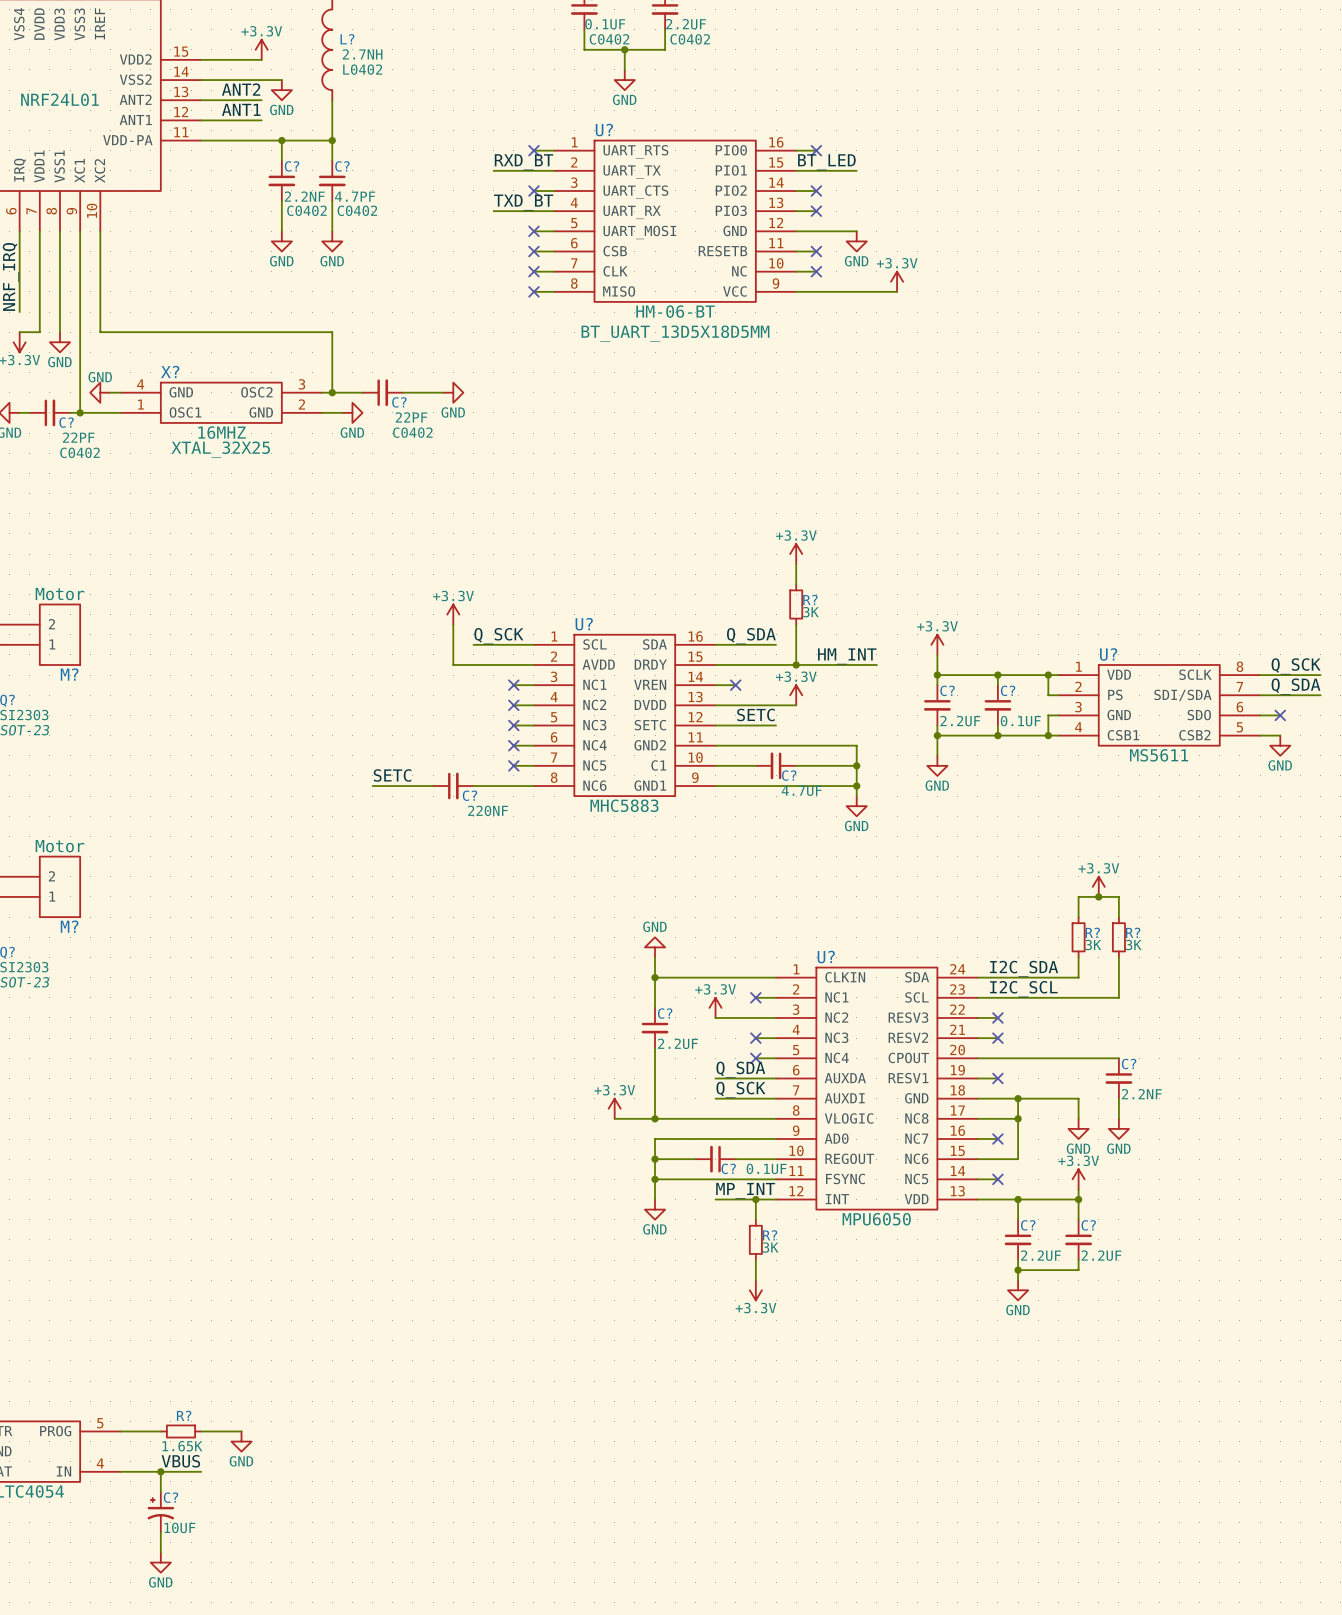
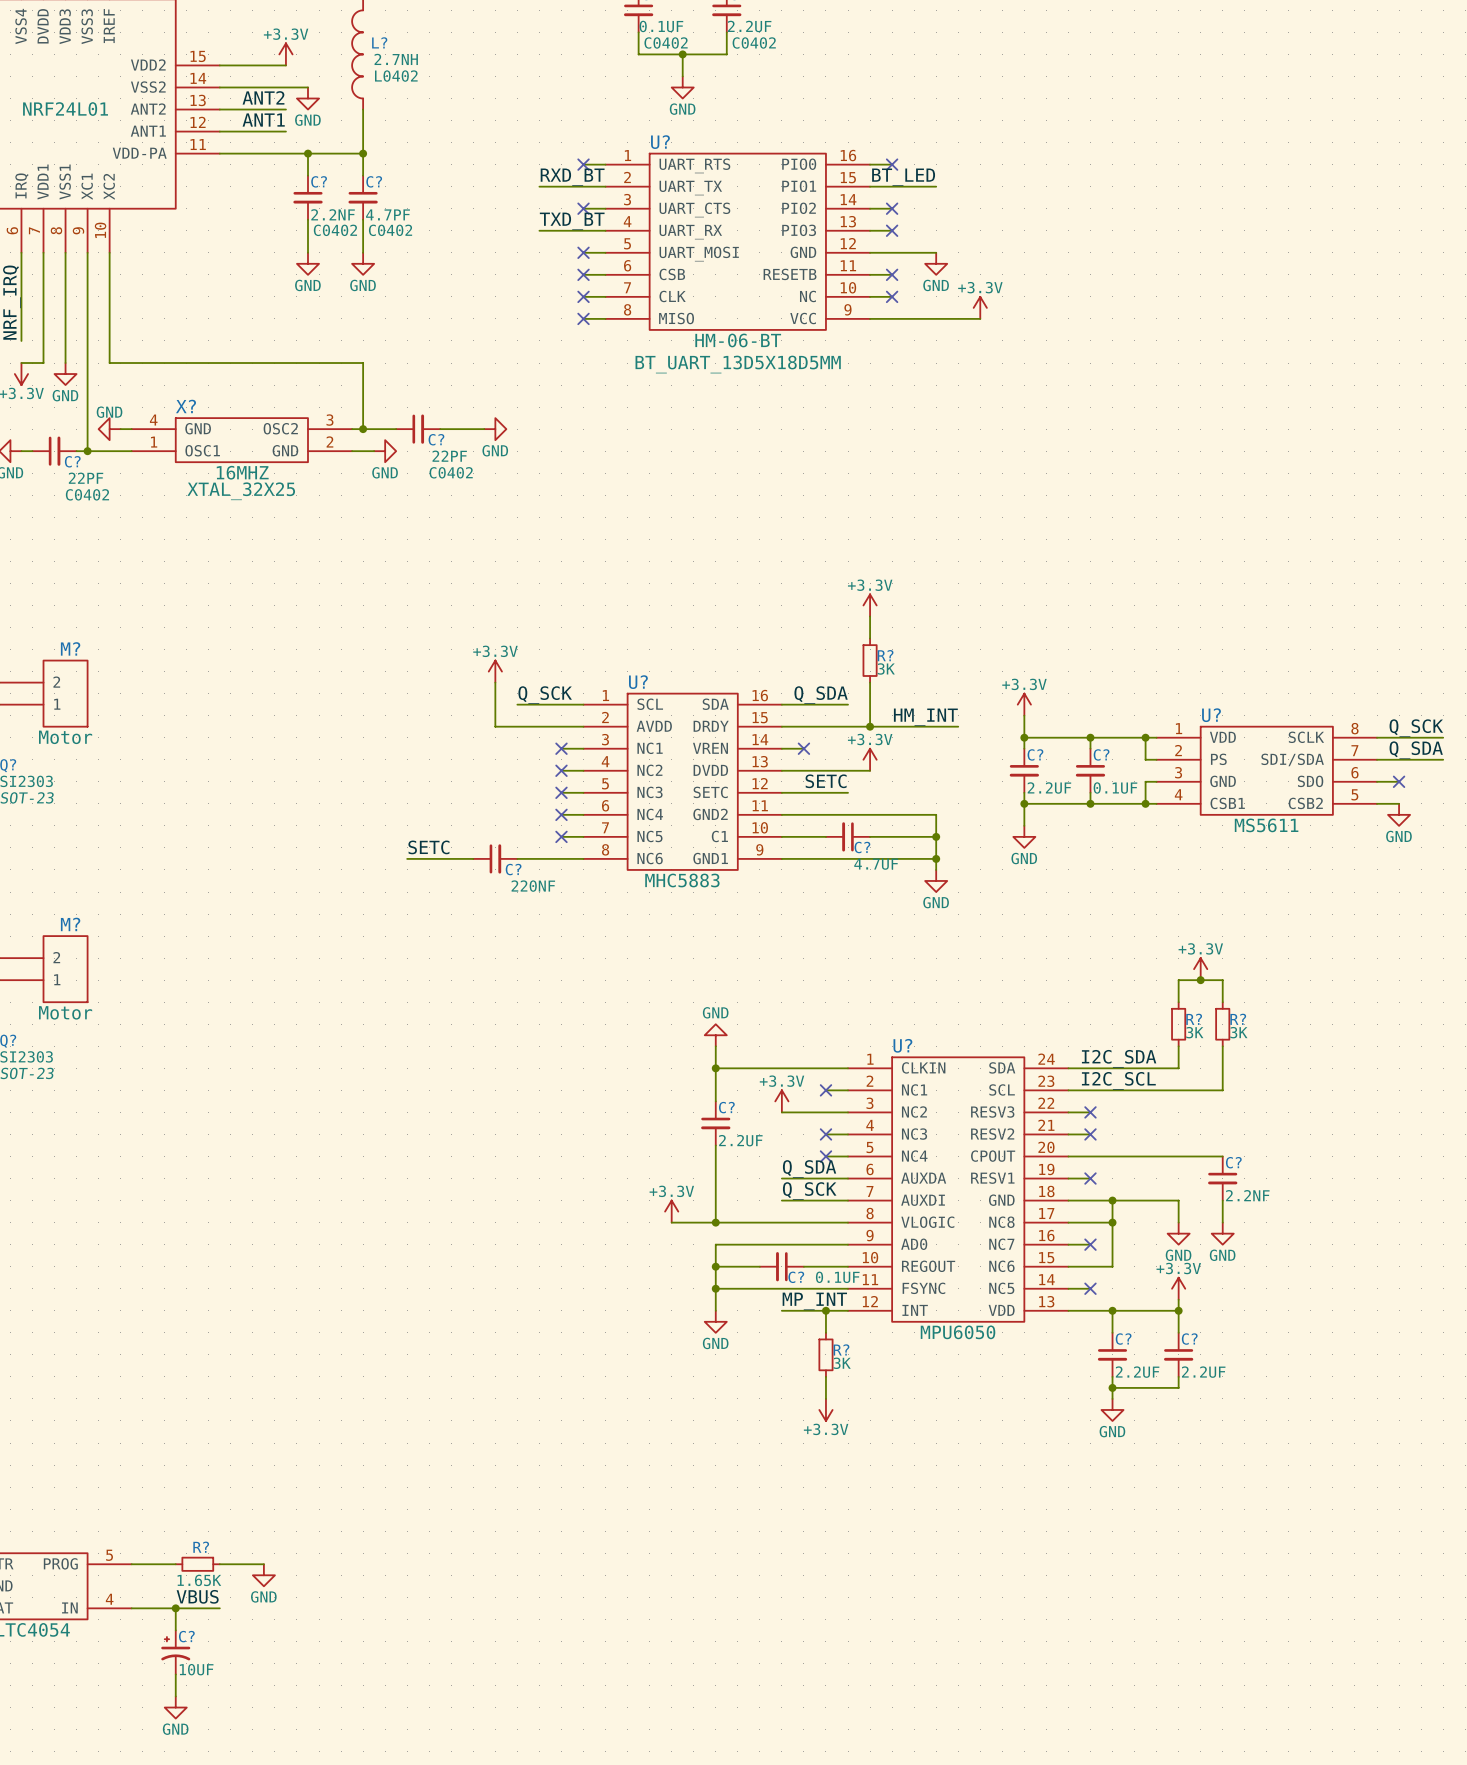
M? value position: Motor (60, 594) -> Motor (65, 737)
M? name position: M? (69, 674) -> M? (70, 648)
M? value position: Motor (60, 846) -> Motor (65, 1012)
M? name position: M? (69, 926) -> M? (70, 924)

